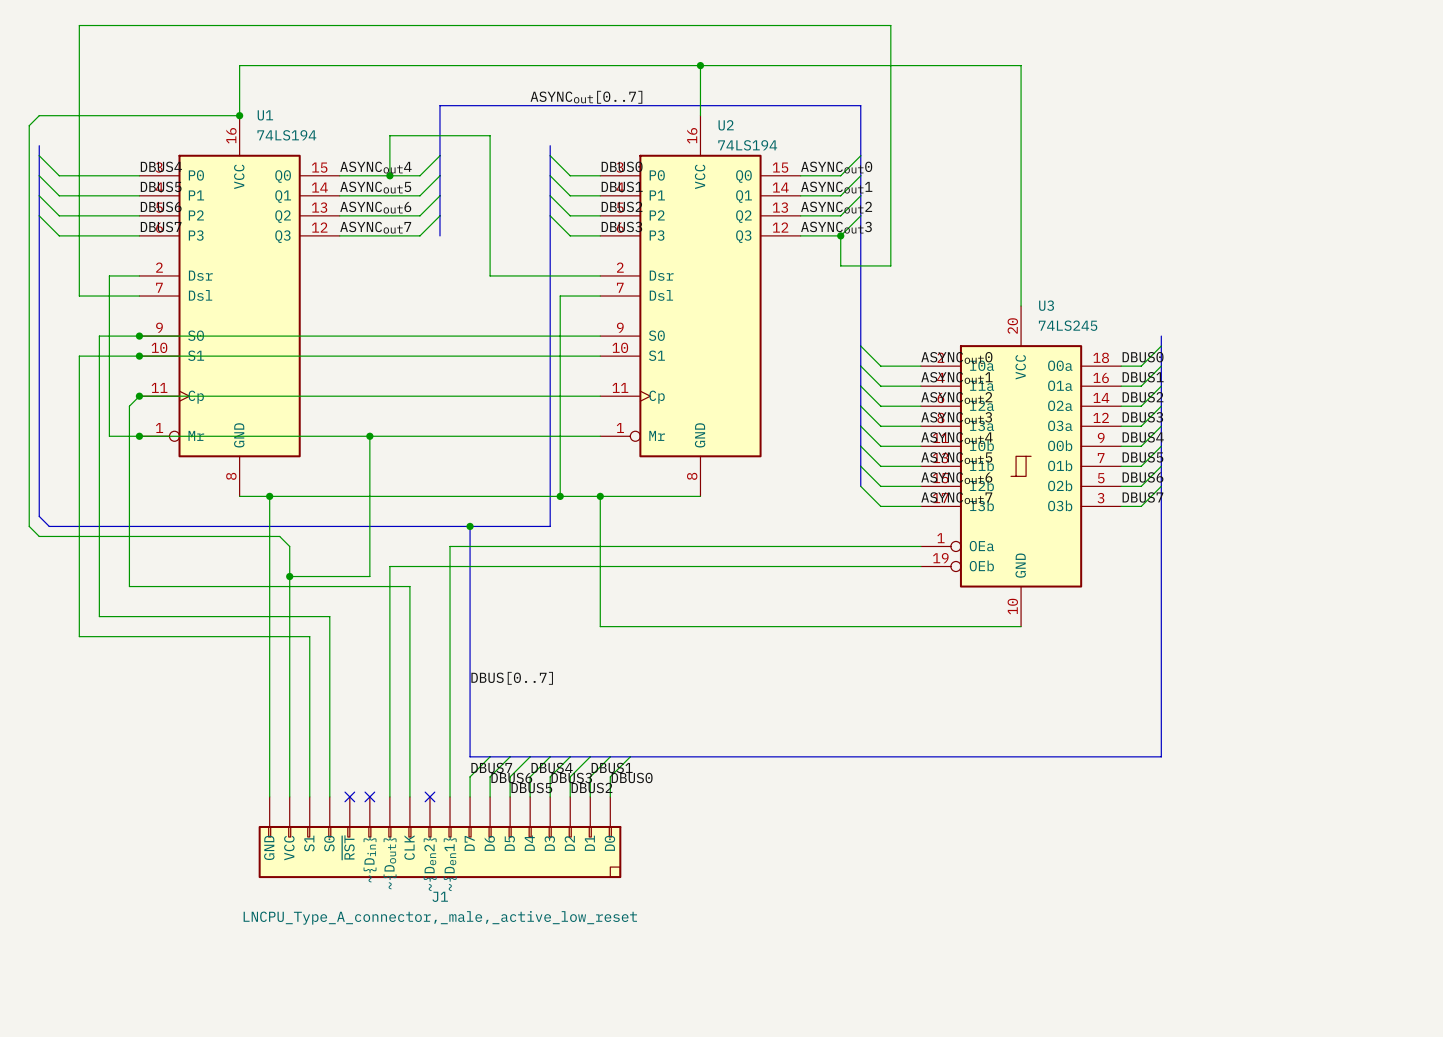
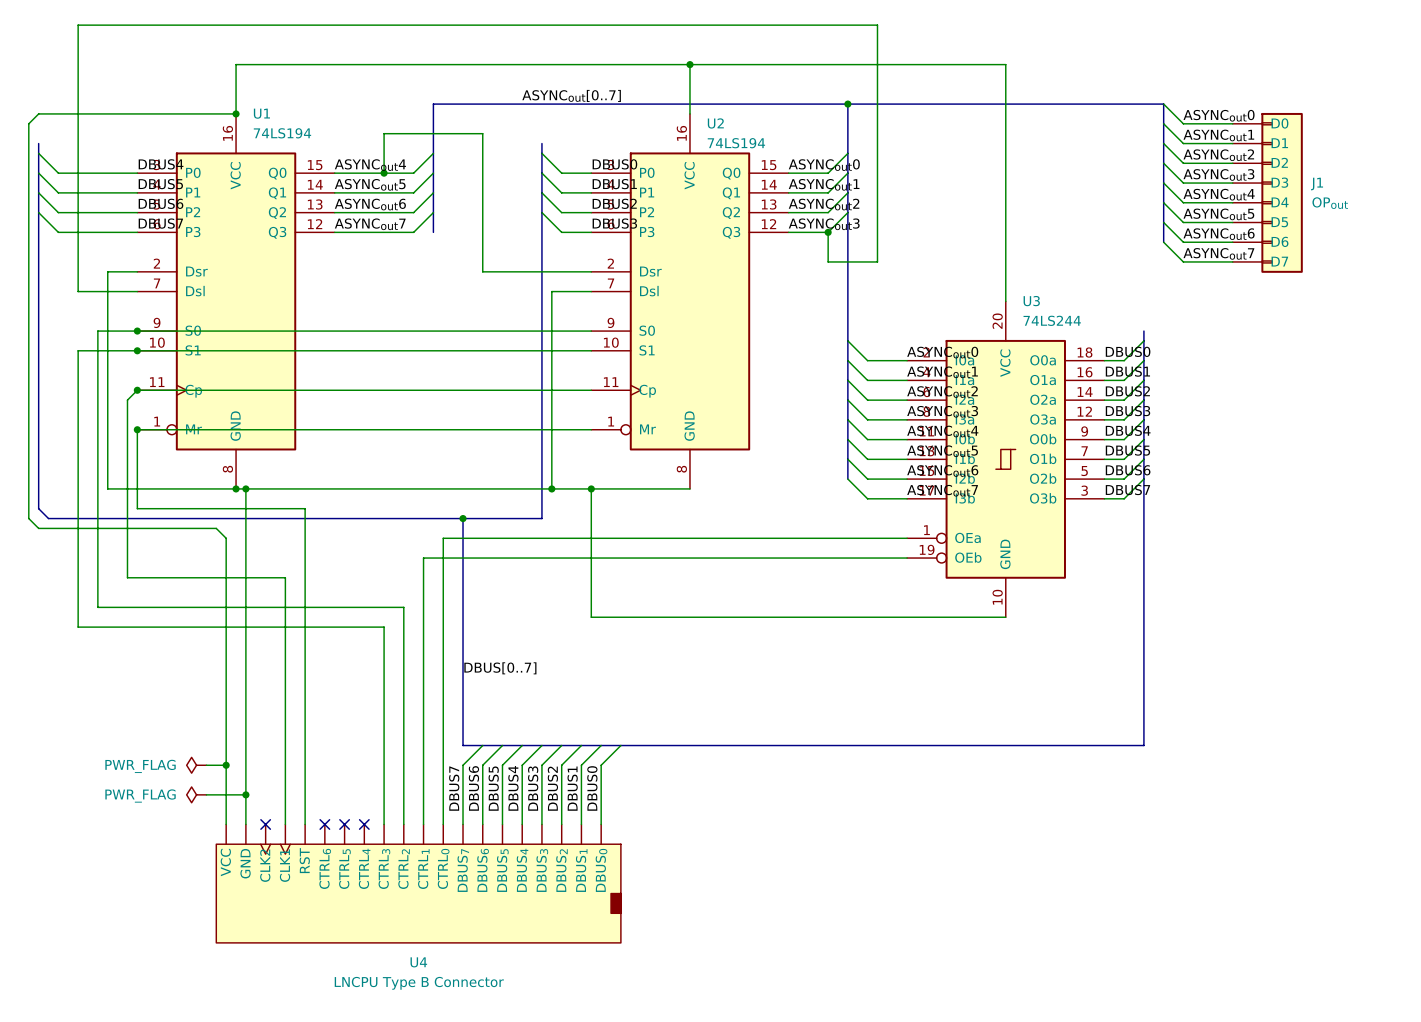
bus: none -> (847, 104) (1163, 104) (1163, 242)
junction: none -> (847, 104)
wire: none -> (1163, 104) (1183, 123) (1232, 123)
label: none -> ASYNCout0 (1219, 115)
wire: none -> (1163, 123) (1183, 143) (1232, 143)
label: none -> ASYNCout1 (1218, 135)
wire: none -> (1163, 143) (1183, 163) (1232, 163)
label: none -> ASYNCout2 (1218, 155)
wire: none -> (1163, 163) (1183, 183) (1232, 183)
label: none -> ASYNCout3 (1218, 174)
wire: none -> (1163, 183) (1183, 202) (1232, 202)
label: none -> ASYNCout4 (1219, 194)
wire: none -> (1163, 202) (1183, 222) (1232, 222)
label: none -> ASYNCout5 (1218, 214)
wire: none -> (1163, 222) (1183, 242) (1232, 242)
label: none -> ASYNCout6 (1219, 234)
wire: none -> (1163, 242) (1183, 261) (1232, 261)
label: none -> ASYNCout7 (1218, 253)
U3 value: 74LS245 (1068, 325) -> 74LS244 (1052, 320)
wire: (109, 436) (139, 436) -> (107, 429) (107, 488) (236, 488)
wire: none -> (137, 429) (137, 508) (305, 508) (305, 627) (384, 627)
wire: (369, 436) (369, 576) (289, 576) -> none
junction: (369, 436) -> none
junction: none -> (236, 488)
wire: none -> (245, 488) (245, 824)
junction: none -> (245, 488)
wire: (269, 496) (269, 796) -> none
junction: (269, 496) -> none
wire: (219, 536) (279, 536) (289, 546) (289, 586) (409, 586) (409, 616) -> (324, 607) (403, 607)
wire: none -> (216, 528) (226, 538) (226, 824)
wire: (429, 566) (389, 566) (389, 636) -> (423, 558) (423, 824)
junction: (289, 576) -> none
wire: (329, 616) (329, 796) -> none
label rotation: 0° (491, 767) -> 90° counterclockwise (454, 788)
label rotation: 0° (552, 767) -> 90° counterclockwise (513, 788)
label rotation: 0° (612, 767) -> 90° counterclockwise (572, 788)
power symbol: none -> PWR_FLAG (196, 765)
wire: none -> (206, 765) (226, 765)
junction: none -> (226, 765)
label rotation: 0° (511, 777) -> 90° counterclockwise (473, 788)
label rotation: 0° (571, 777) -> 90° counterclockwise (533, 788)
label rotation: 0° (632, 777) -> 90° counterclockwise (592, 788)
label rotation: 0° (531, 787) -> 90° counterclockwise (493, 788)
label rotation: 0° (591, 787) -> 90° counterclockwise (552, 788)
J1 symbol: [258, 796, 622, 879] -> [1232, 112, 1303, 273]
no-connect mark: (349, 796) -> none
no-connect mark: (369, 796) -> none
no-connect mark: (429, 796) -> none
power symbol: none -> PWR_FLAG (196, 794)
wire: none -> (206, 794) (245, 794)
junction: none -> (245, 794)
no-connect mark: none -> (265, 824)
no-connect mark: none -> (324, 824)
no-connect mark: none -> (344, 824)
no-connect mark: none -> (364, 824)
J1 name position: J1 (440, 896) -> J1 (1317, 184)
U4: none -> LNCPU Type B Connector (418, 883)
J1 value: LNCPU_Type_A_connector,_male,_active_low_reset (440, 917) -> OPout (1330, 203)

